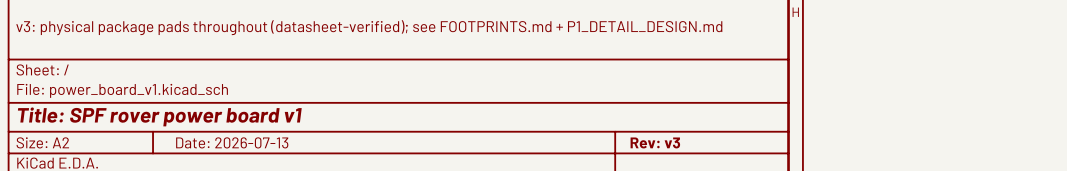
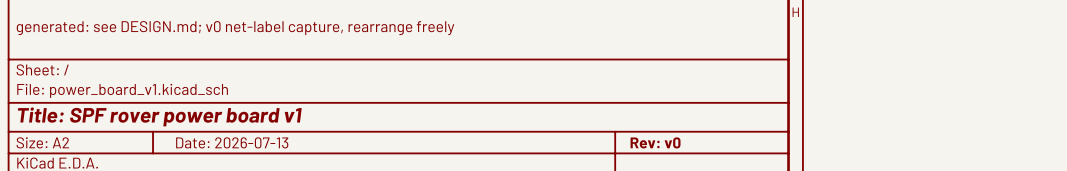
title block: v3: physical package pads throughout (datasheet-verified); see FOOTPRINTS.md + P1_DETAIL_DESIGN.md (369, 27) -> generated: see DESIGN.md; v0 net-label capture, rearrange freely (235, 28)
title block: Rev: v3 (655, 142) -> Rev: v0 (655, 142)

